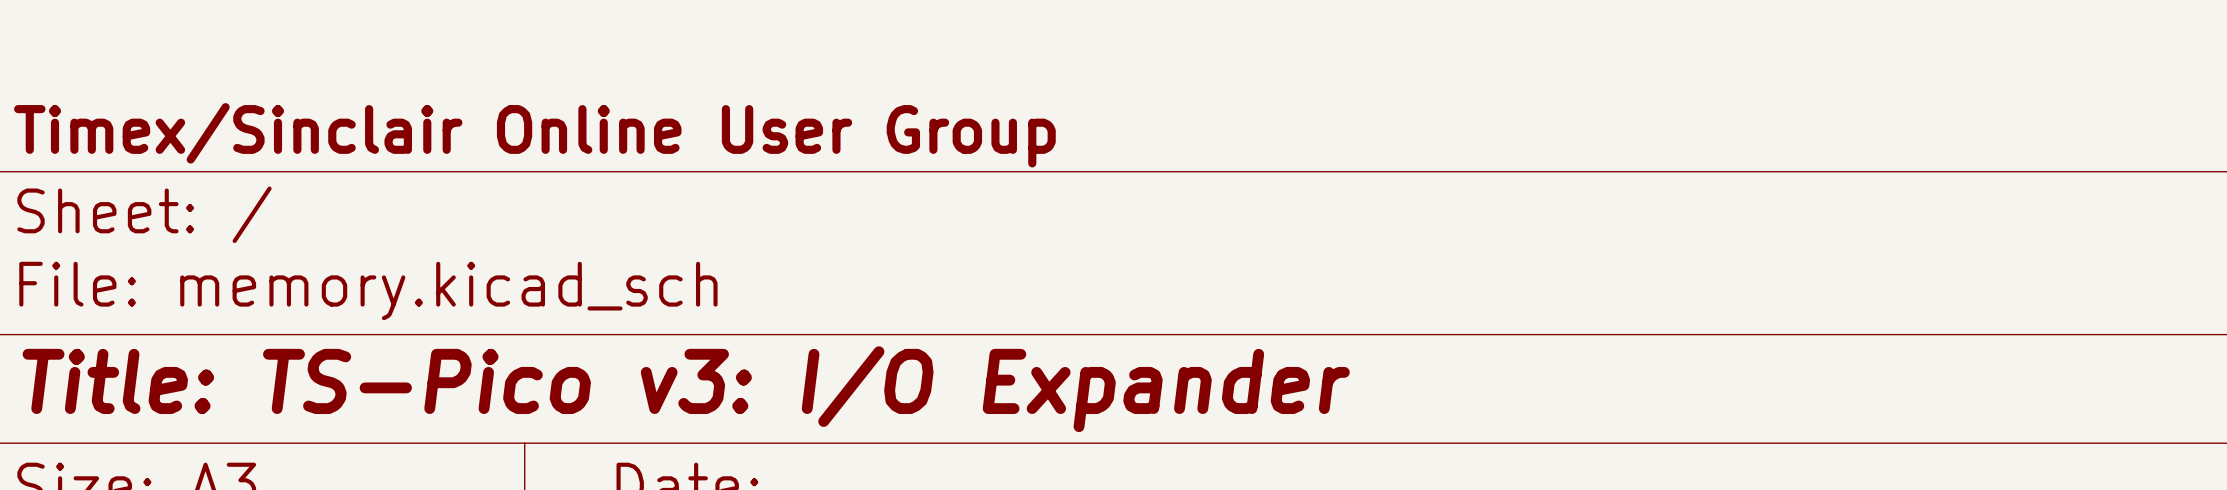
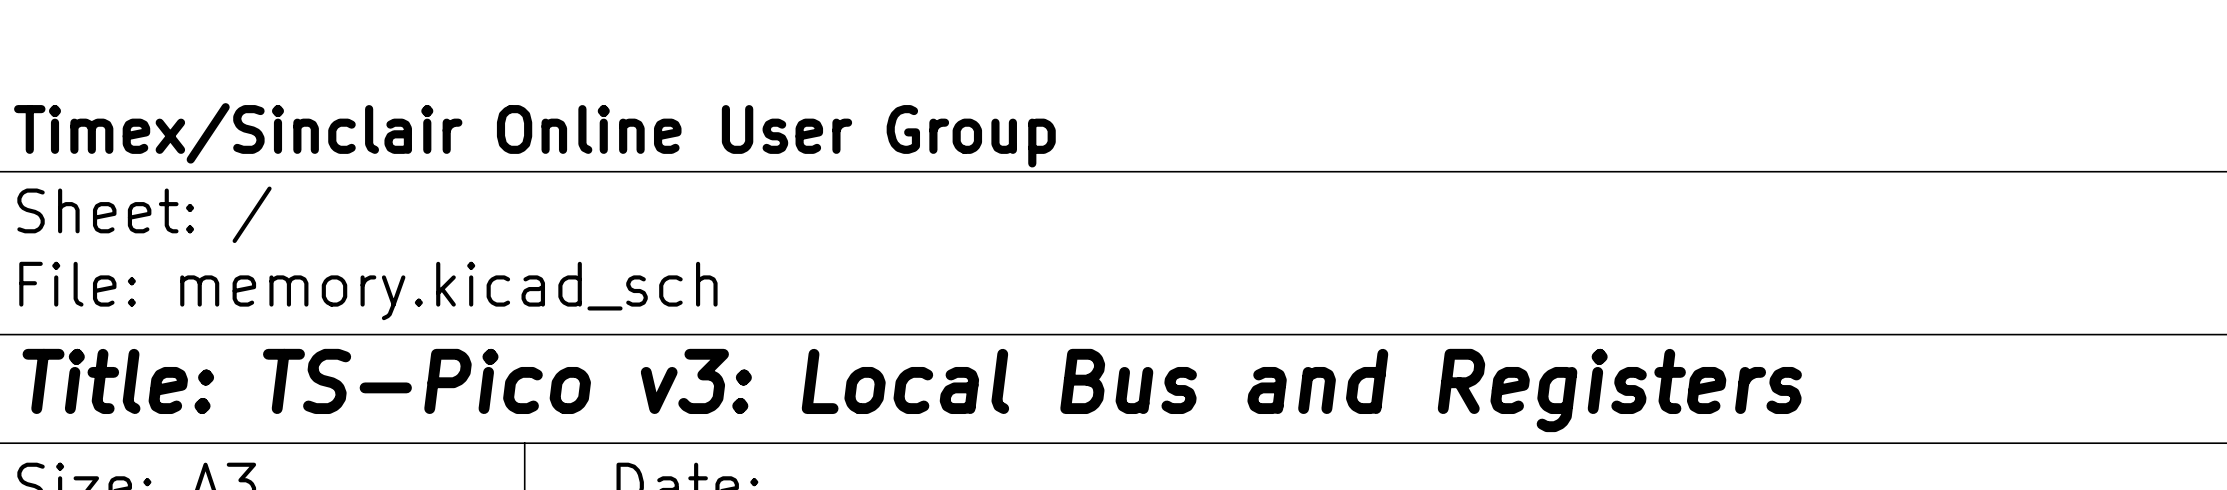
title block: Title: TS-Pico v3: I/O Expander (686, 389) -> Title: TS-Pico v3: Local Bus and Registers (912, 390)

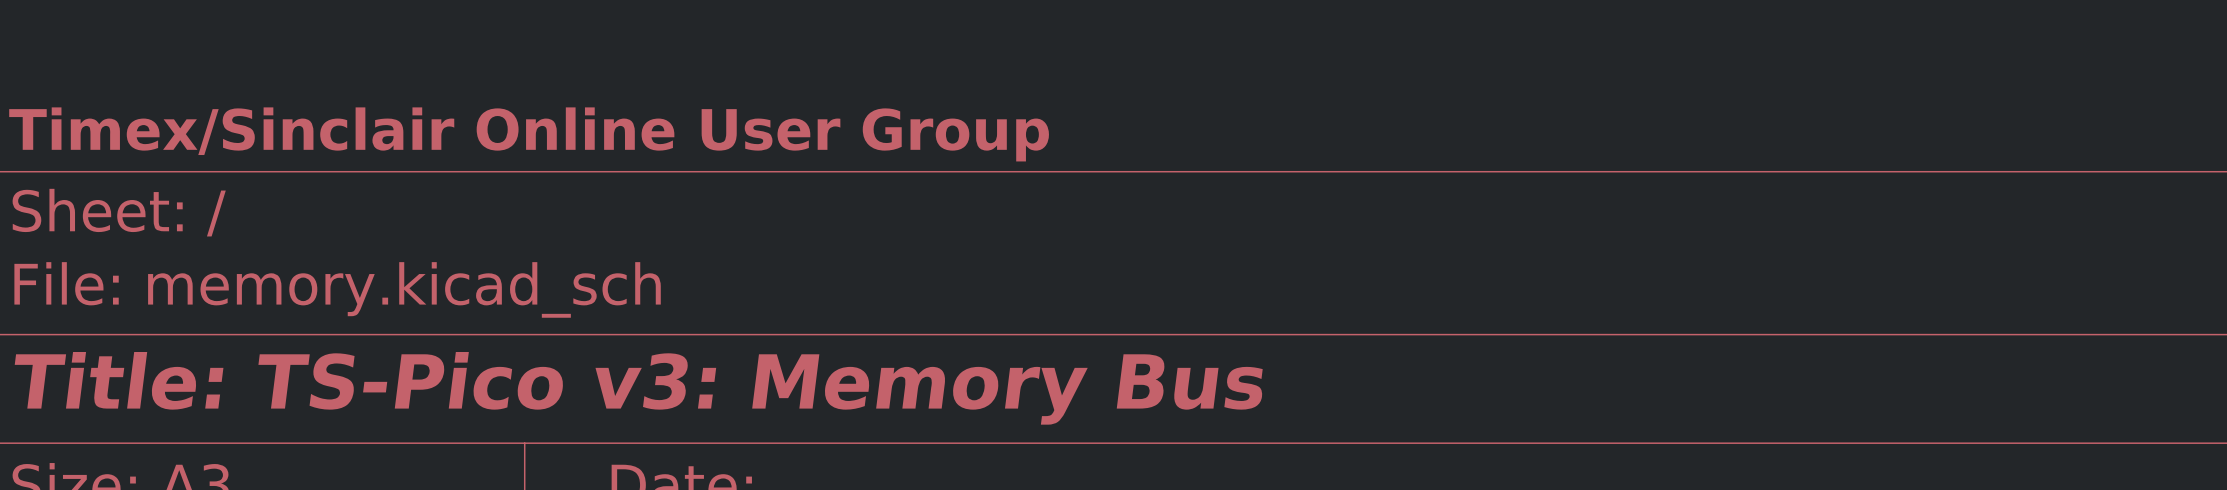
title block: Title: TS-Pico v3: Local Bus and Registers (912, 390) -> Title: TS-Pico v3: Memory Bus (638, 388)

